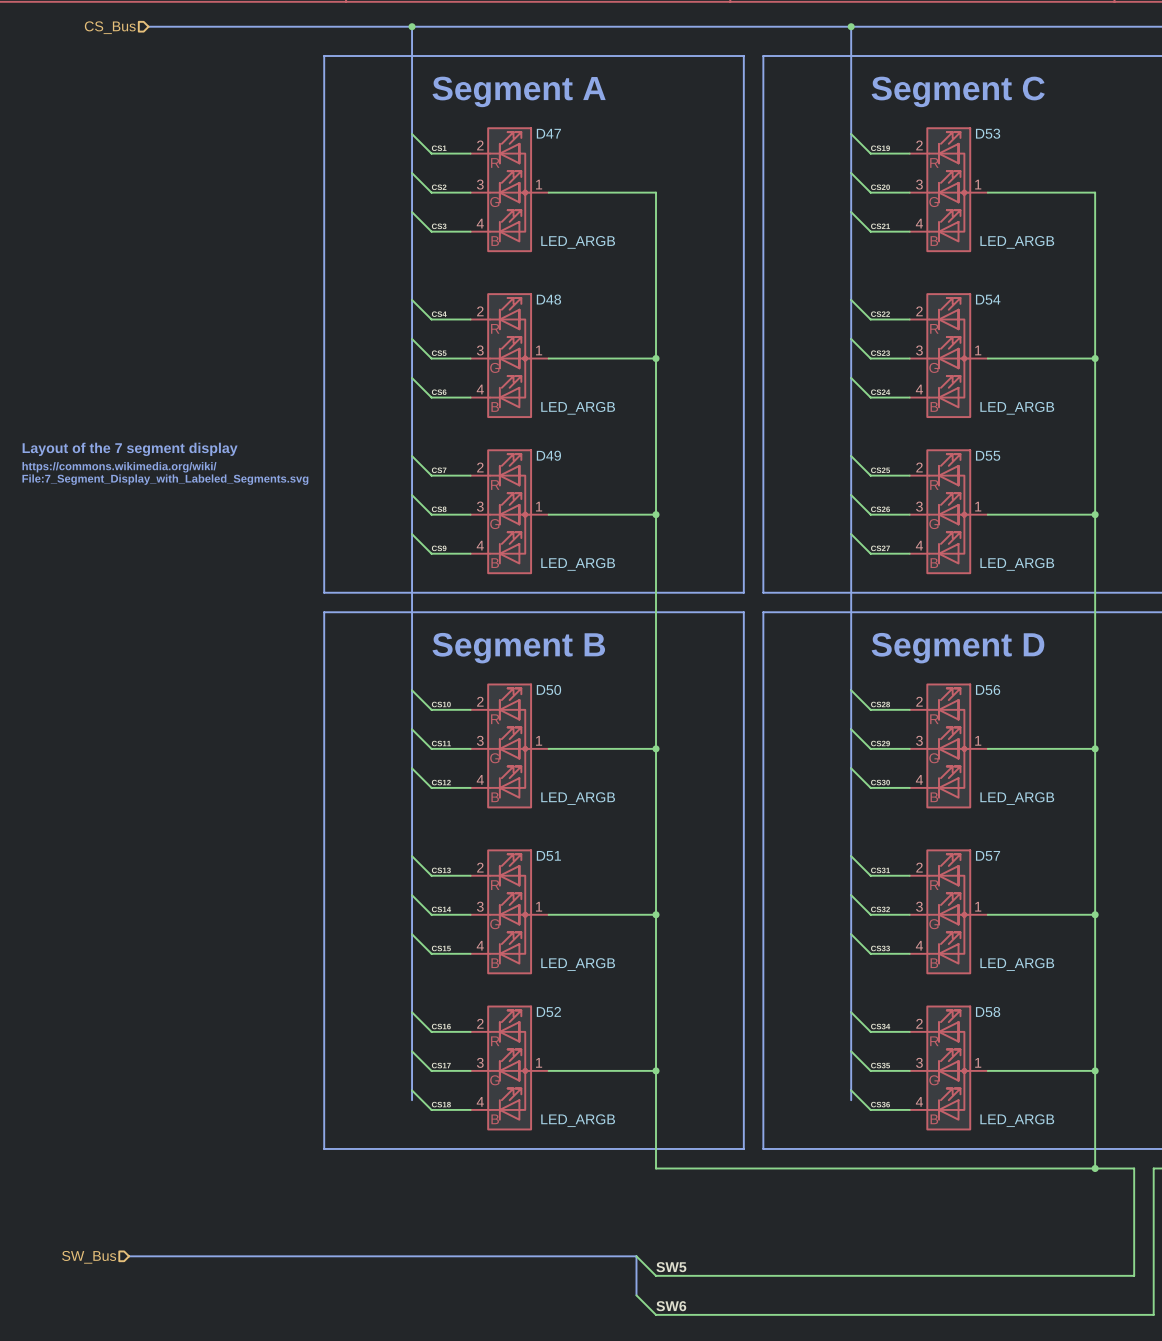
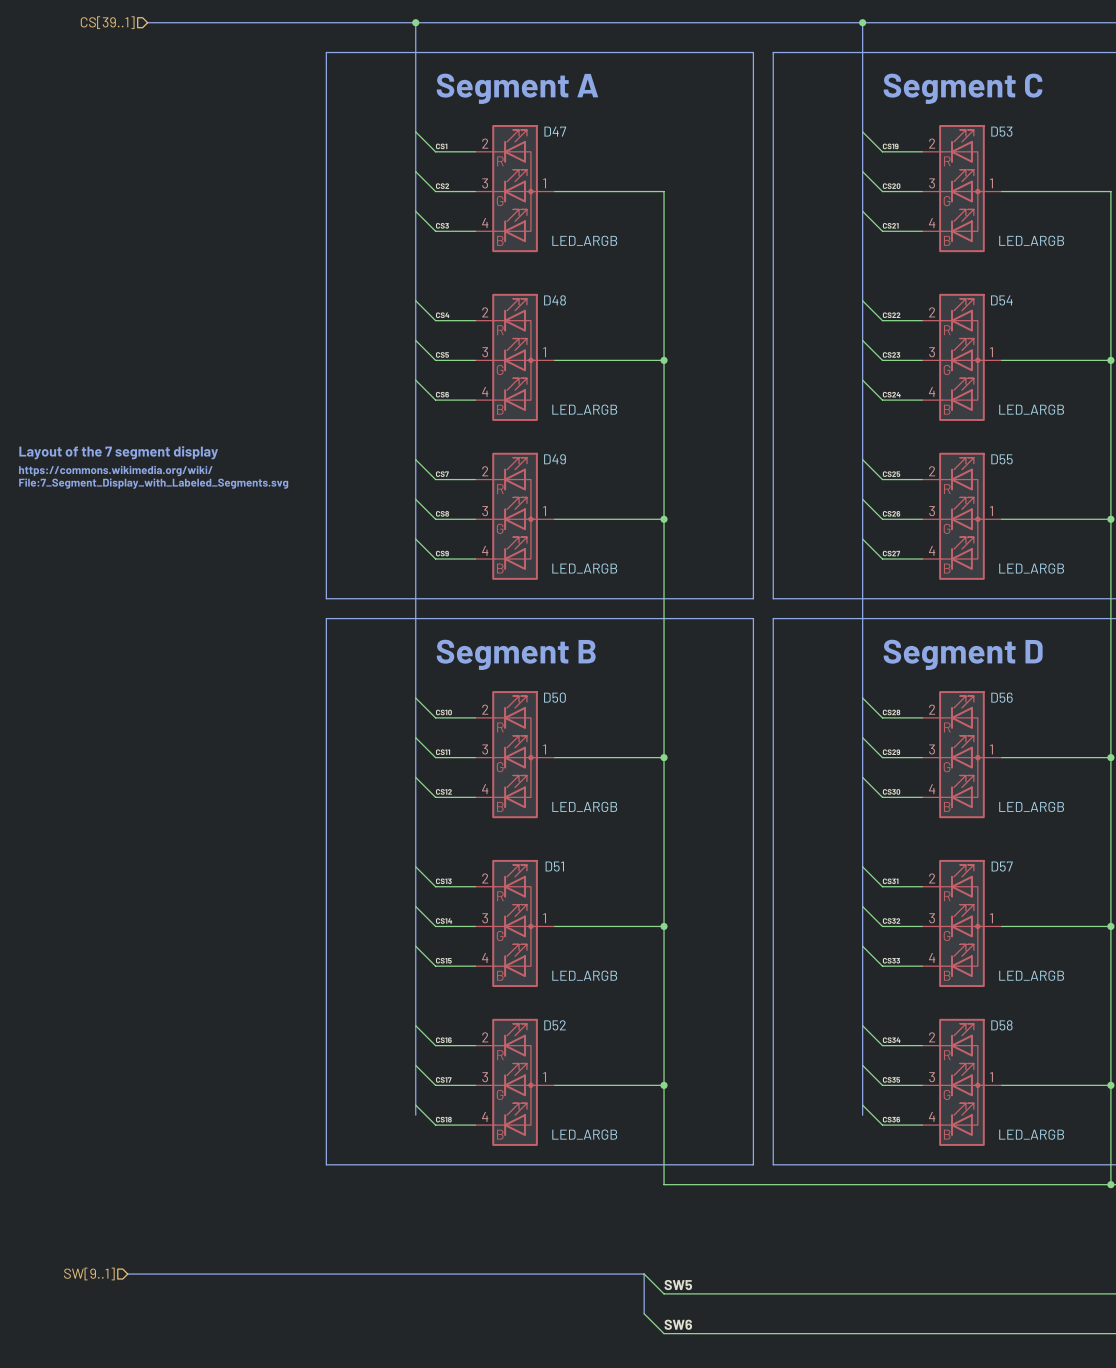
hierarchical label: CS_Bus (110, 27) -> CS[39..1] (107, 22)
hierarchical label: SW_Bus (89, 1257) -> SW[9..1] (89, 1274)

